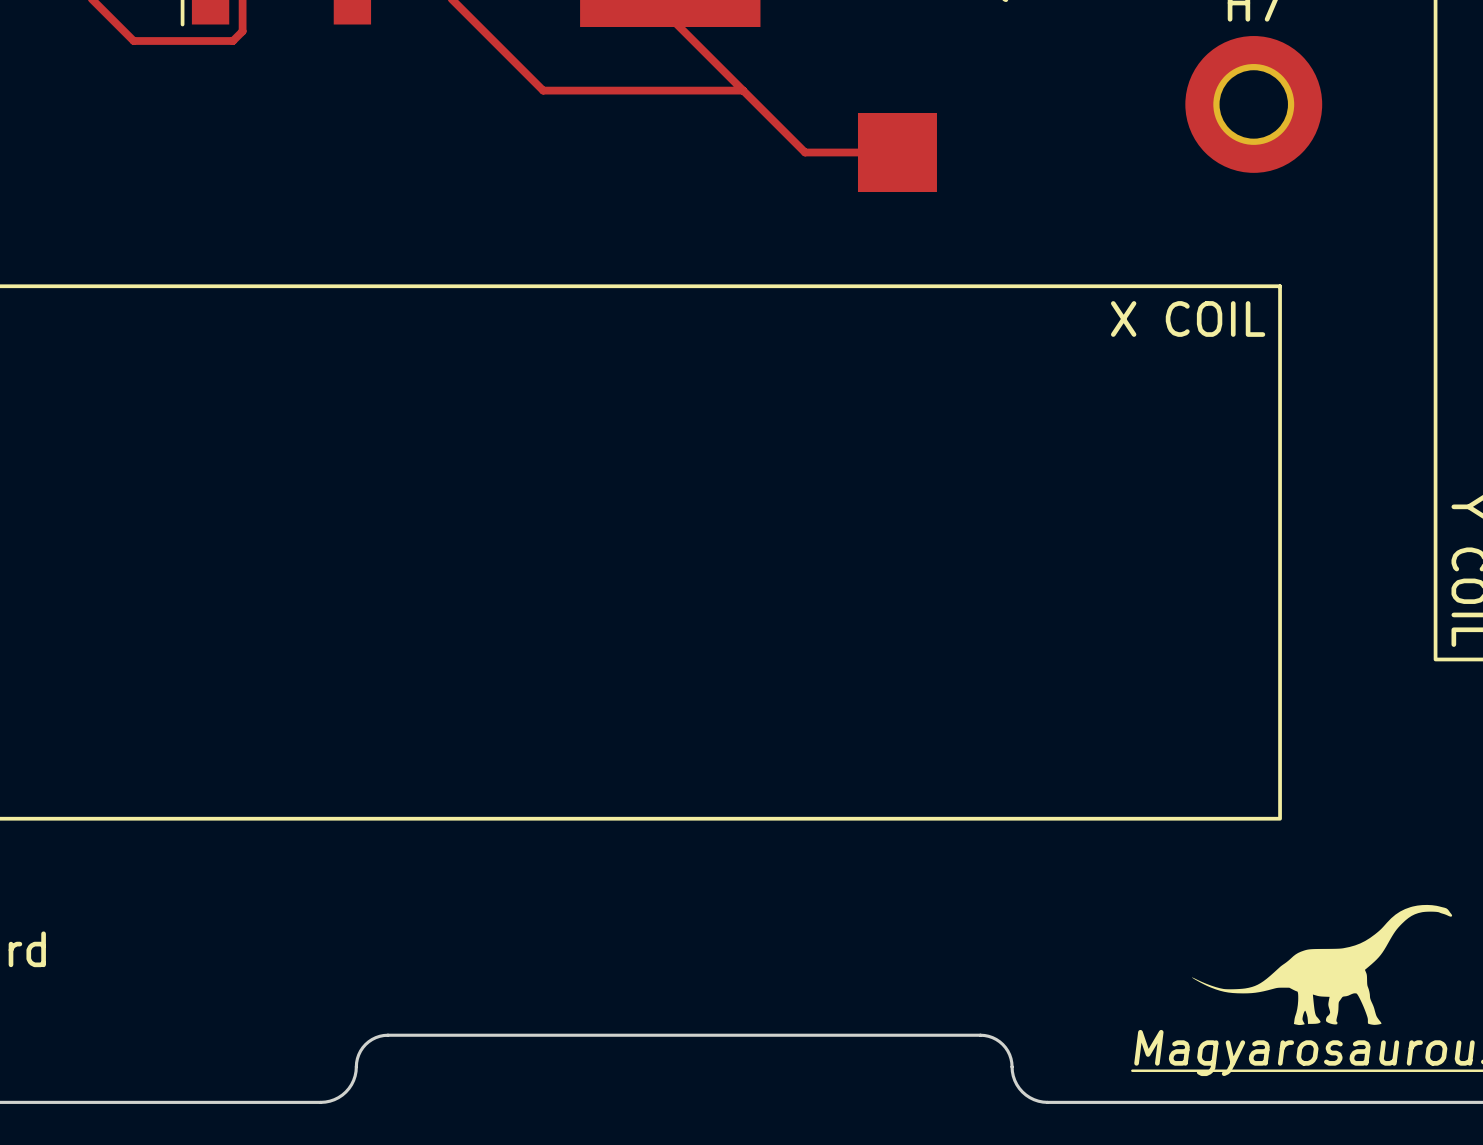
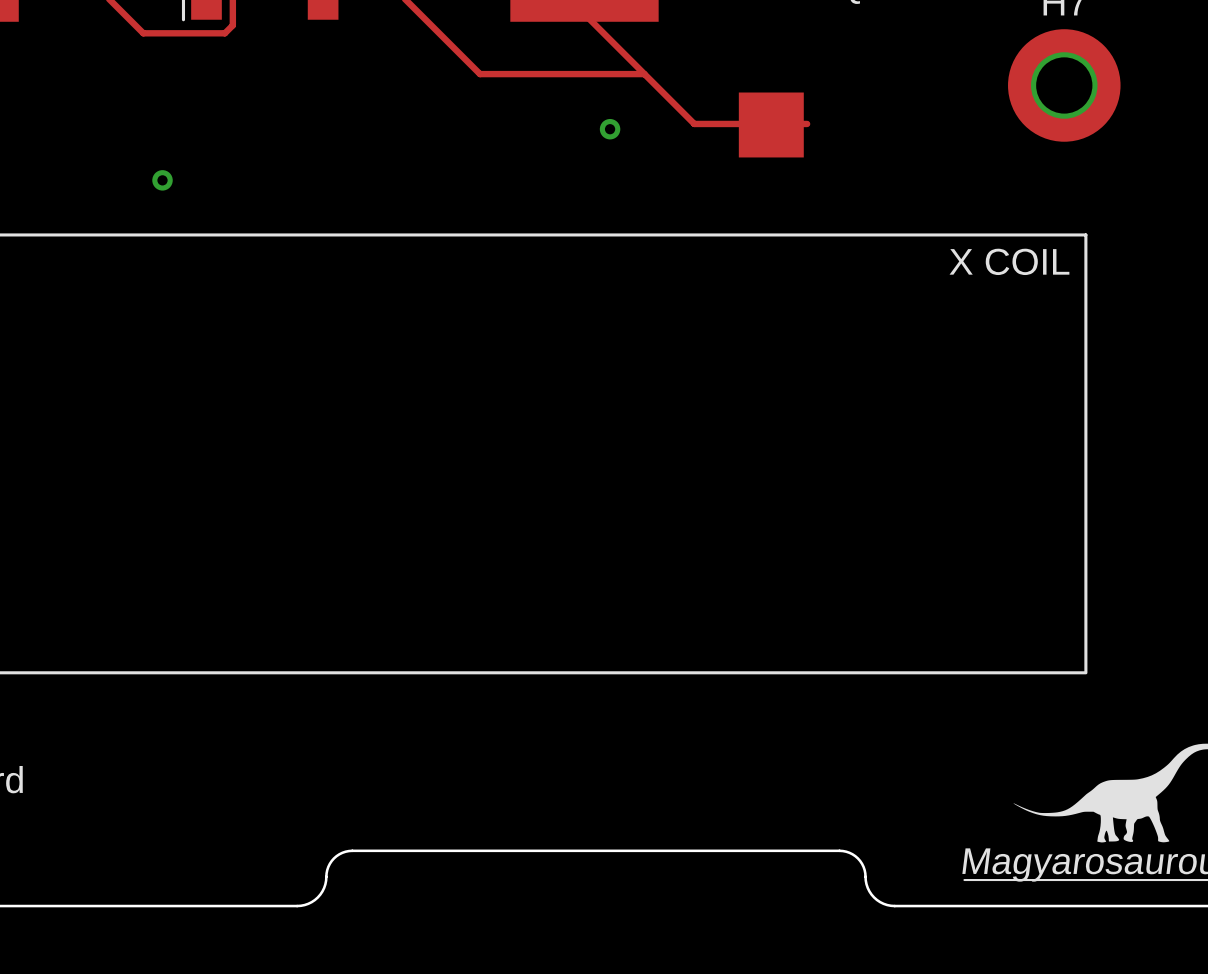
track: (803, 151) (897, 152) -> (694, 123) (807, 123)
via: none -> (610, 129)
via: none -> (162, 180)

